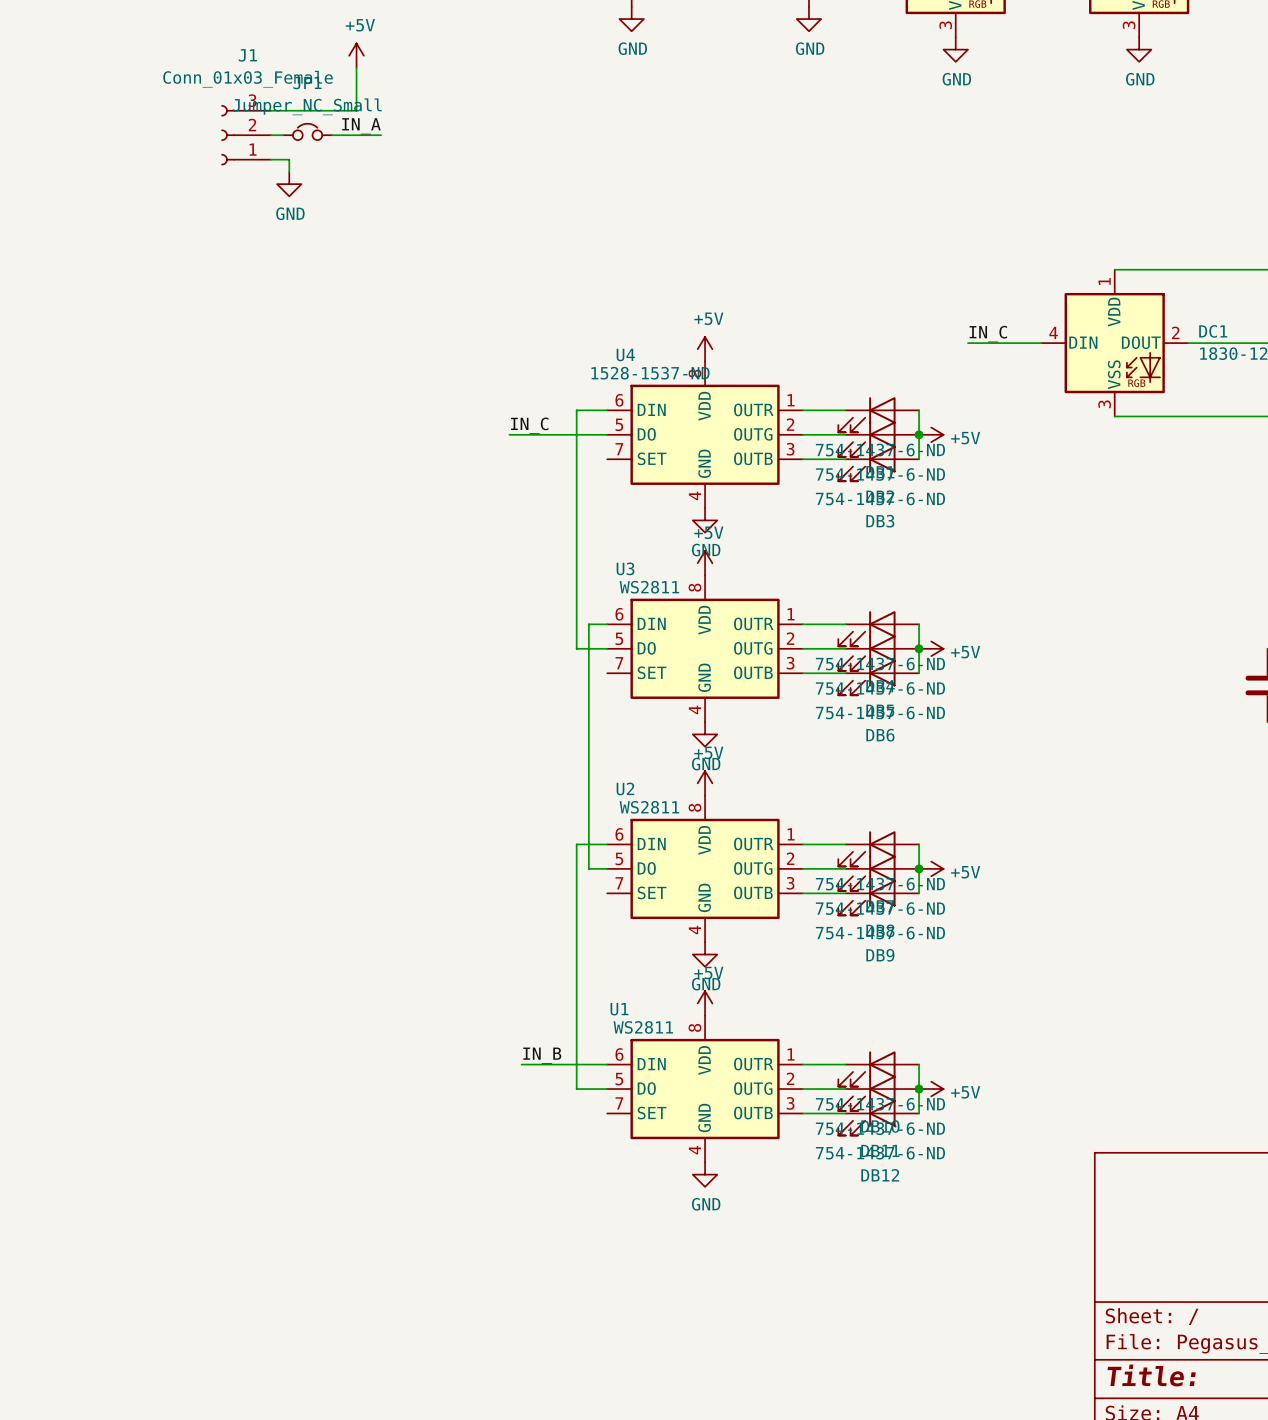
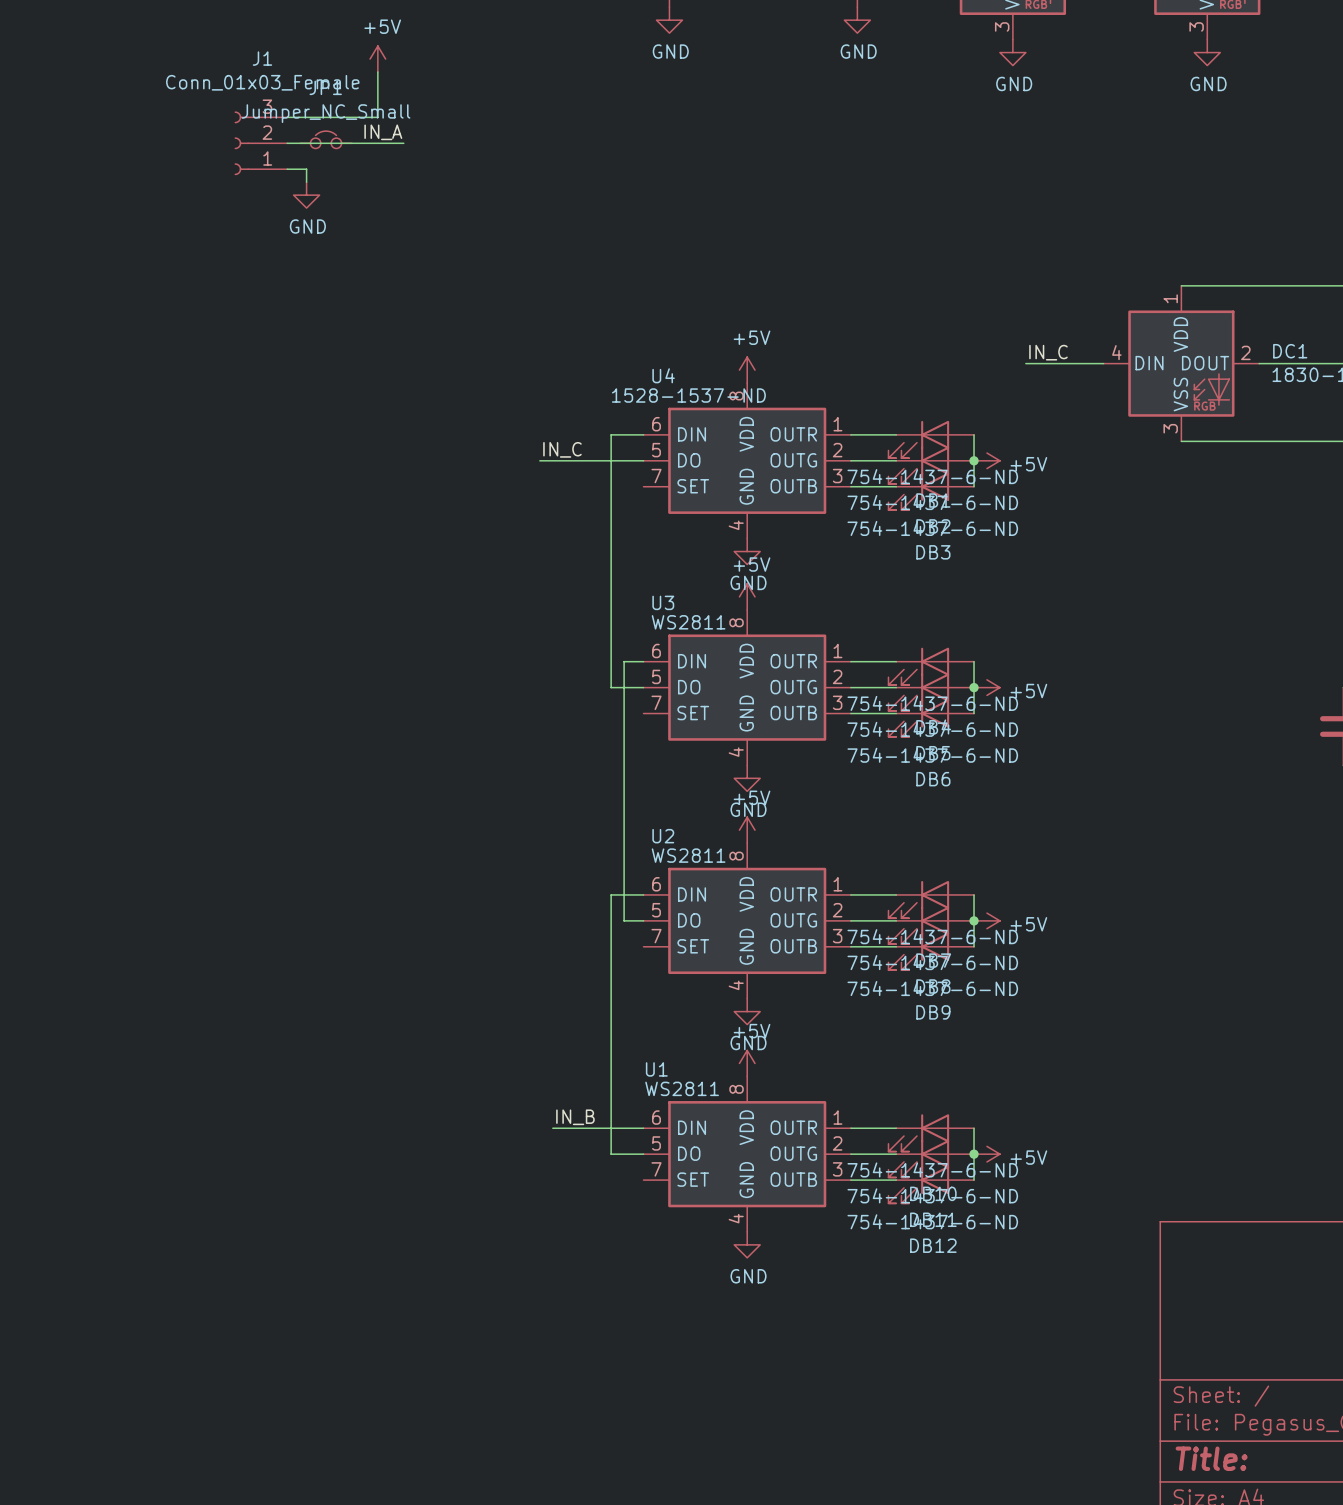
wire: none -> (300, 143) (351, 143)

